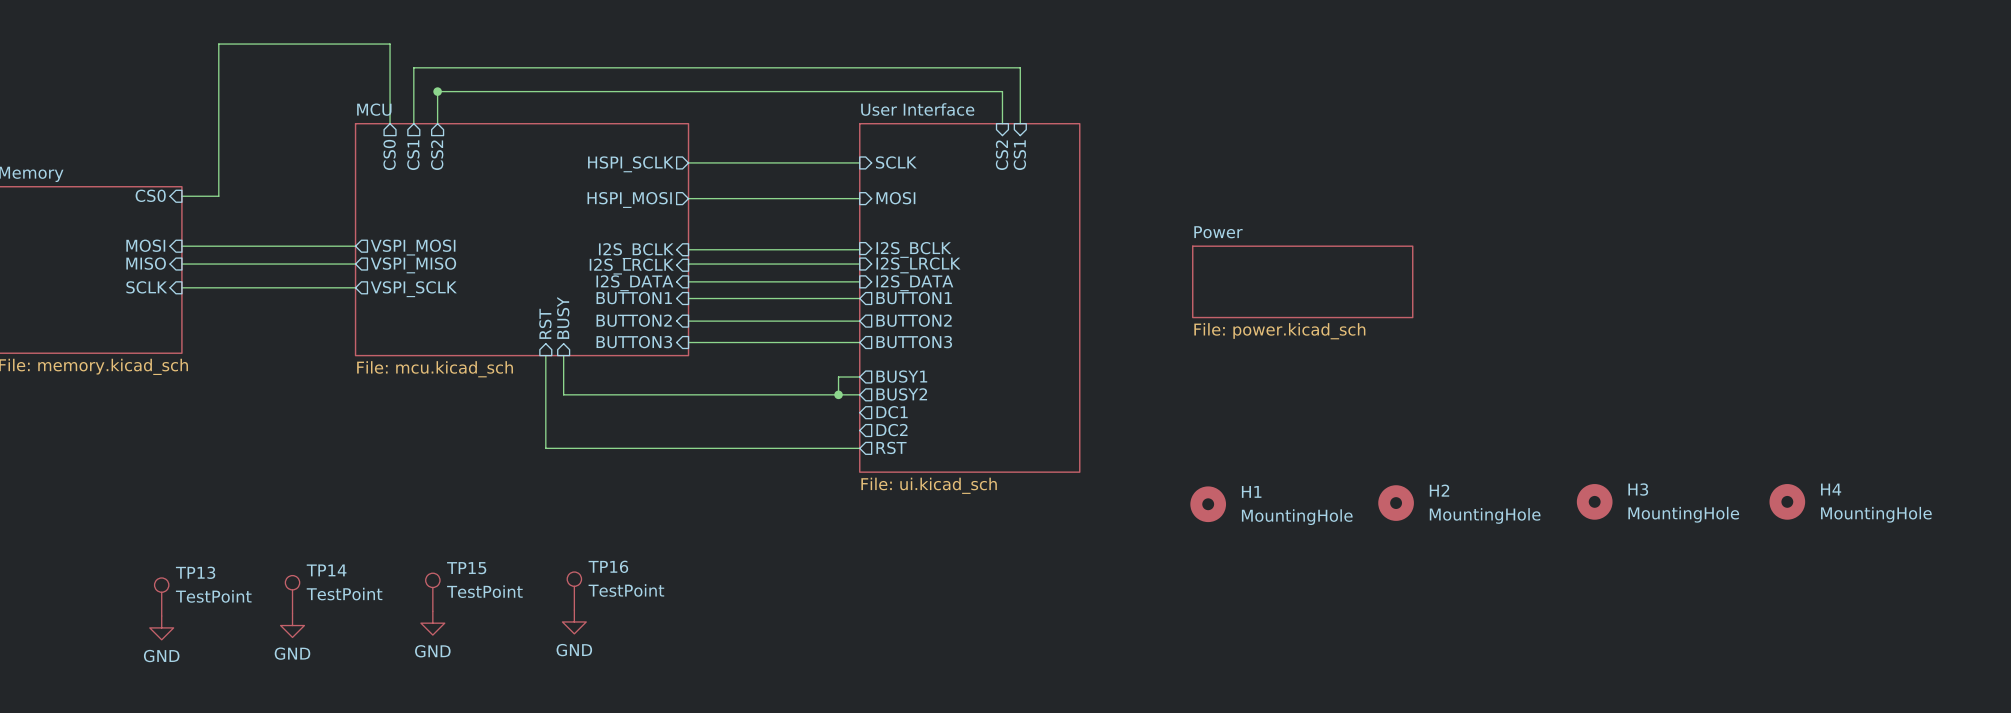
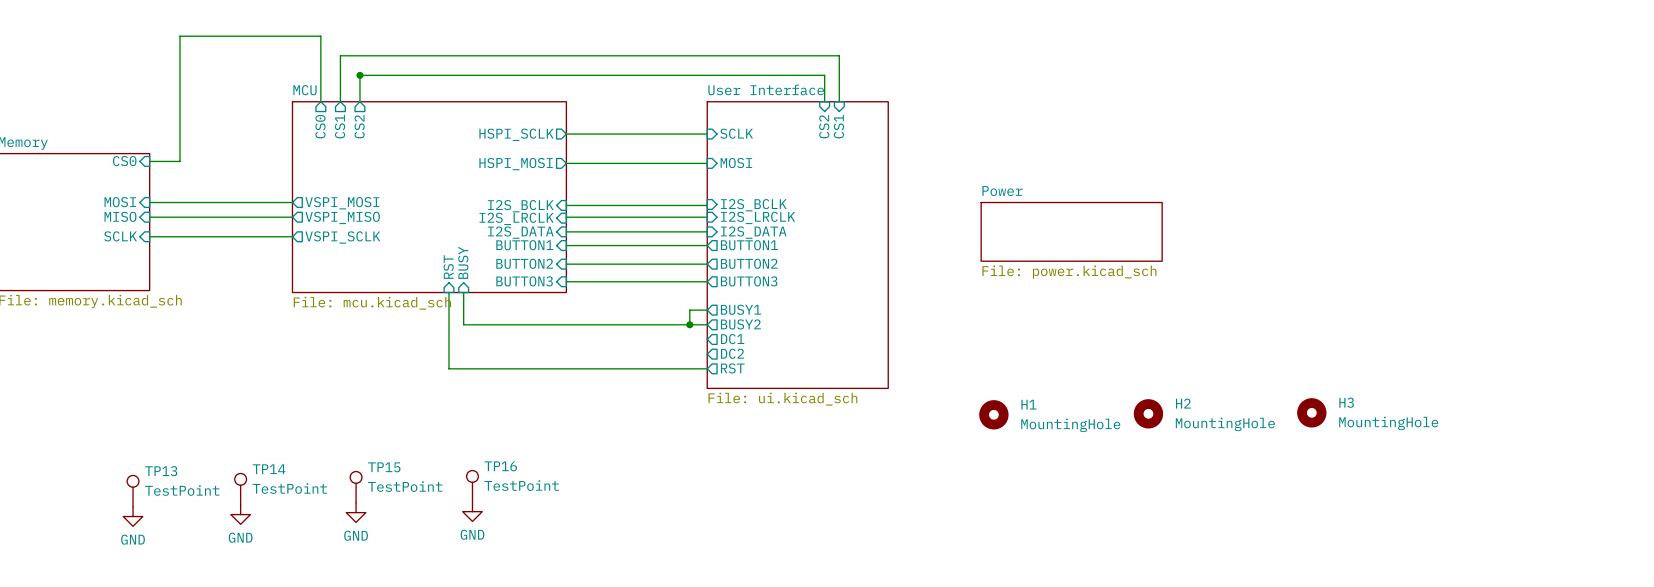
H4: MountingHole (1787, 501) -> none

